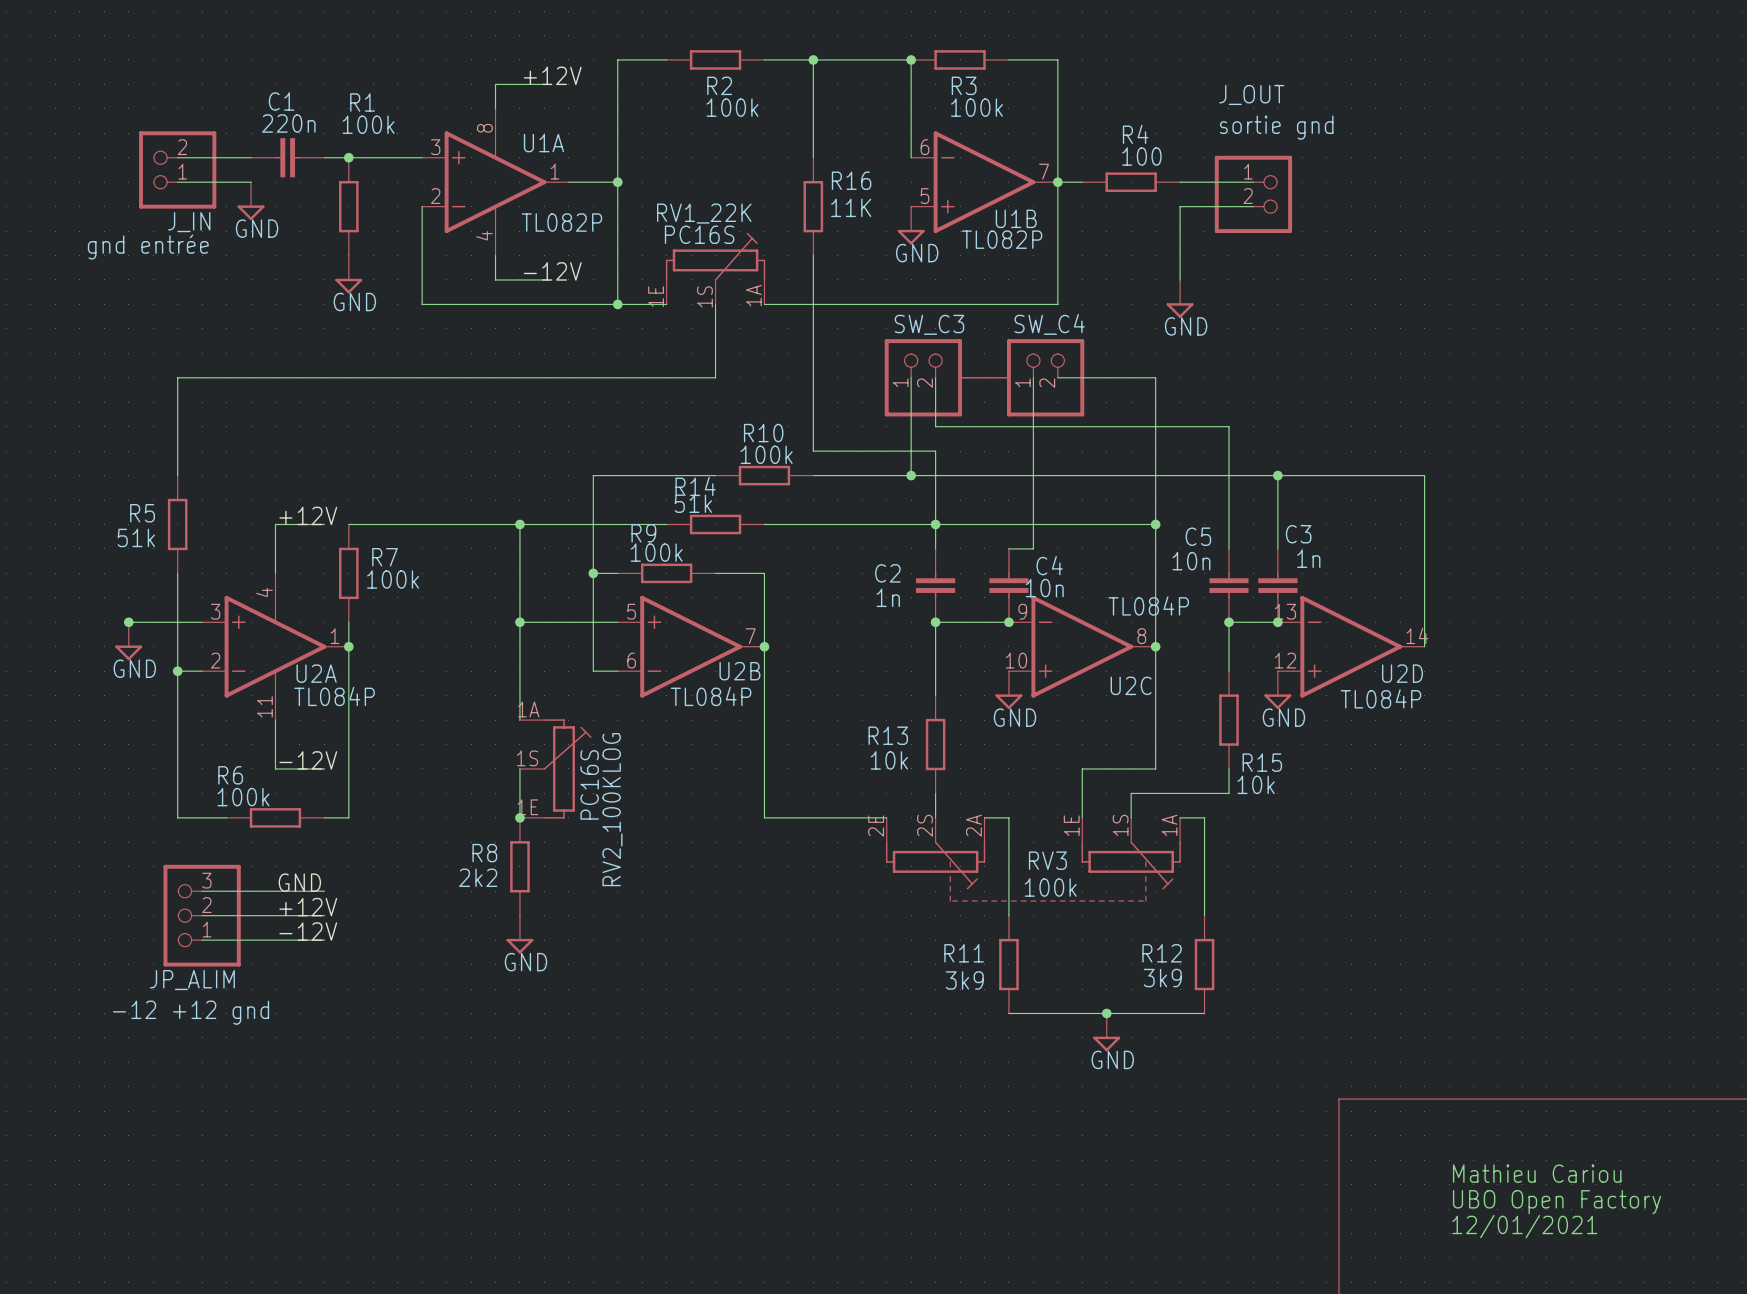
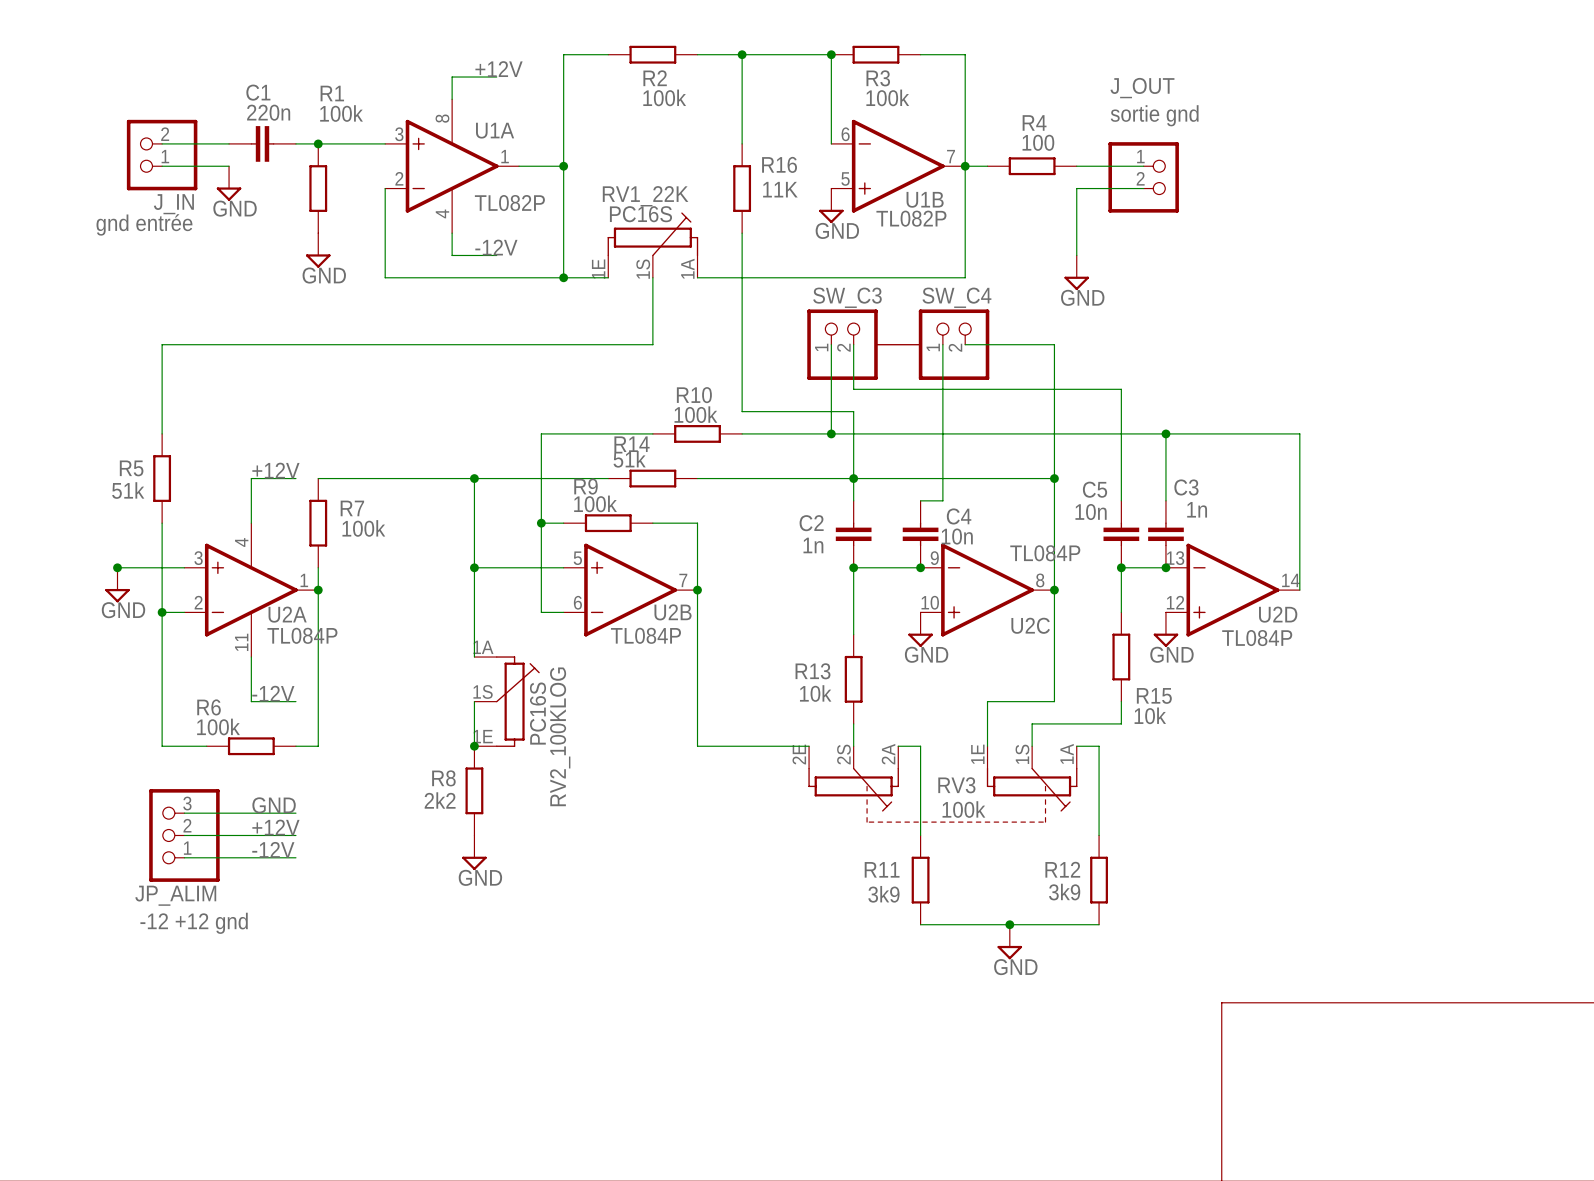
text: Mathieu Cariou (1537, 1173) -> none
text: UBO Open Factory (1557, 1202) -> none
text: 12/01/2021 (1524, 1226) -> none

